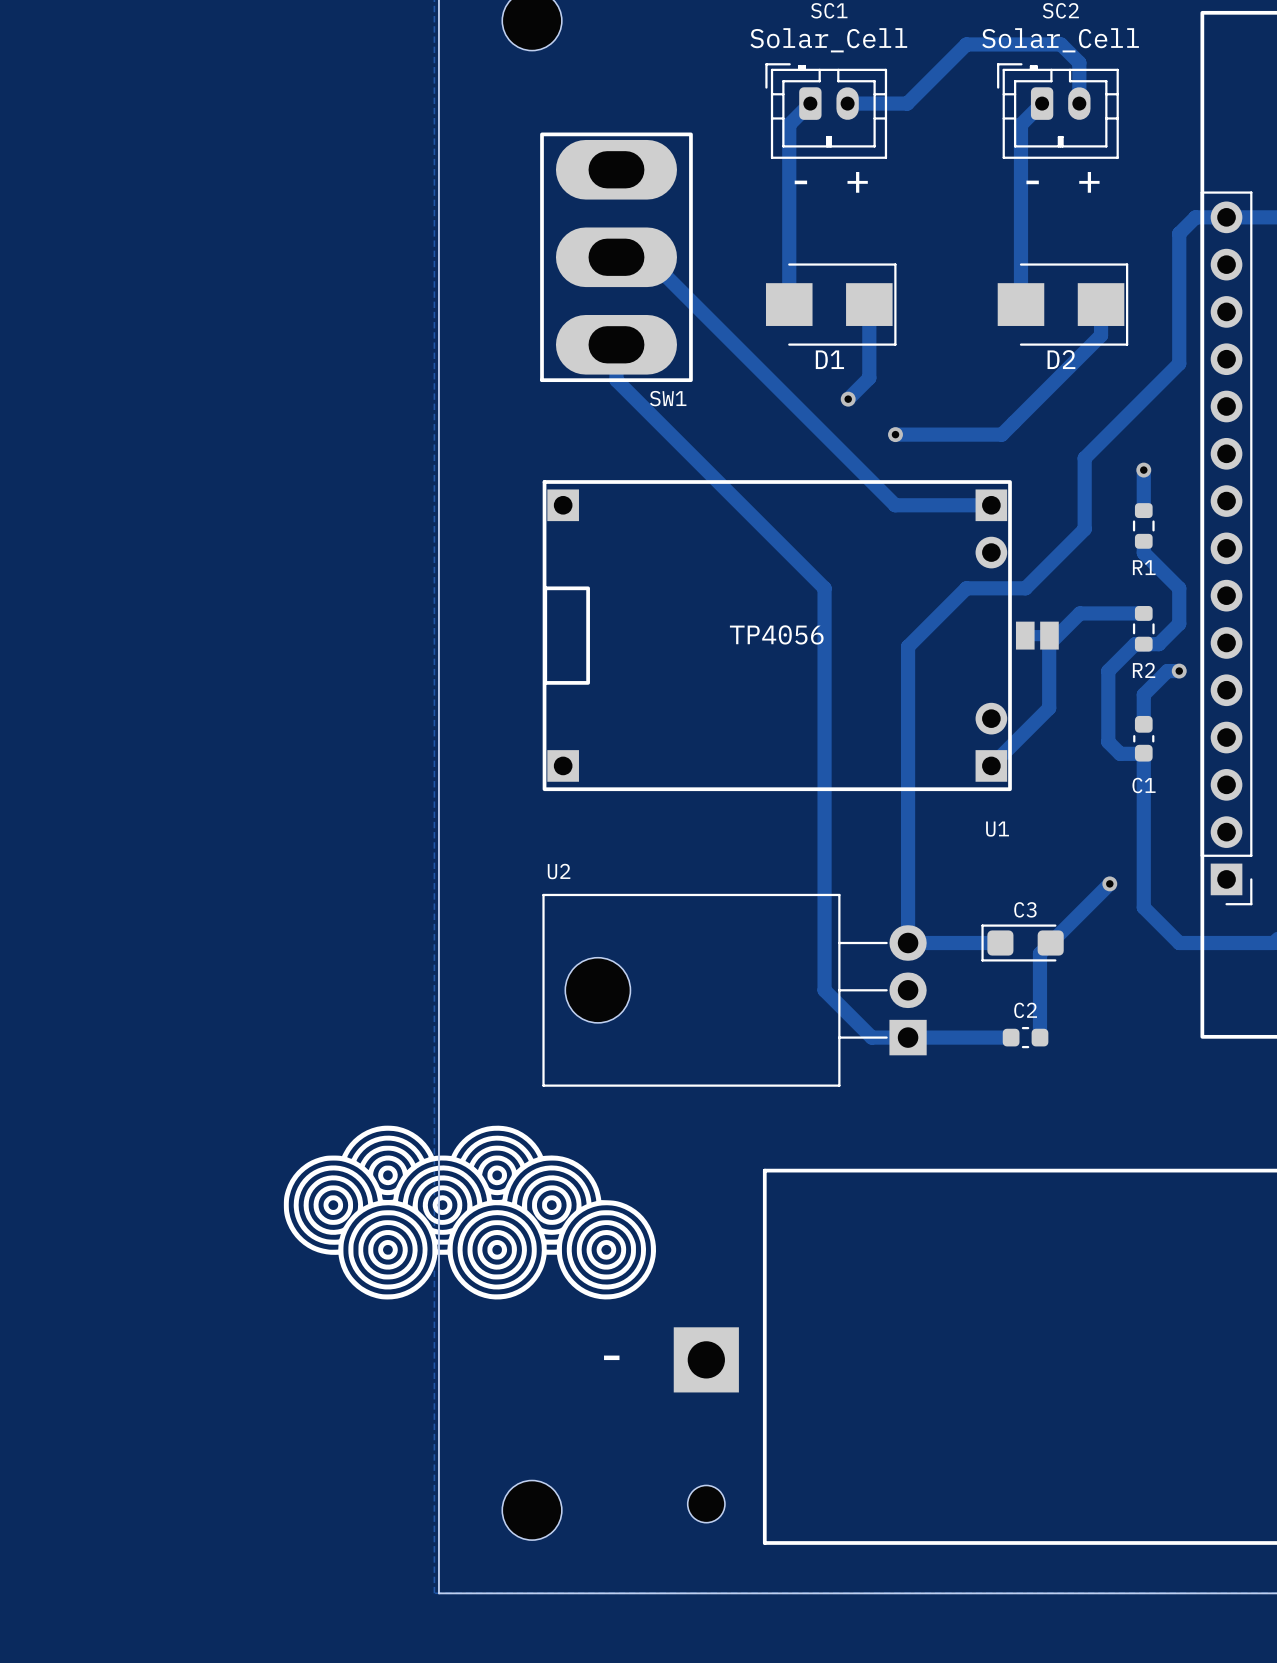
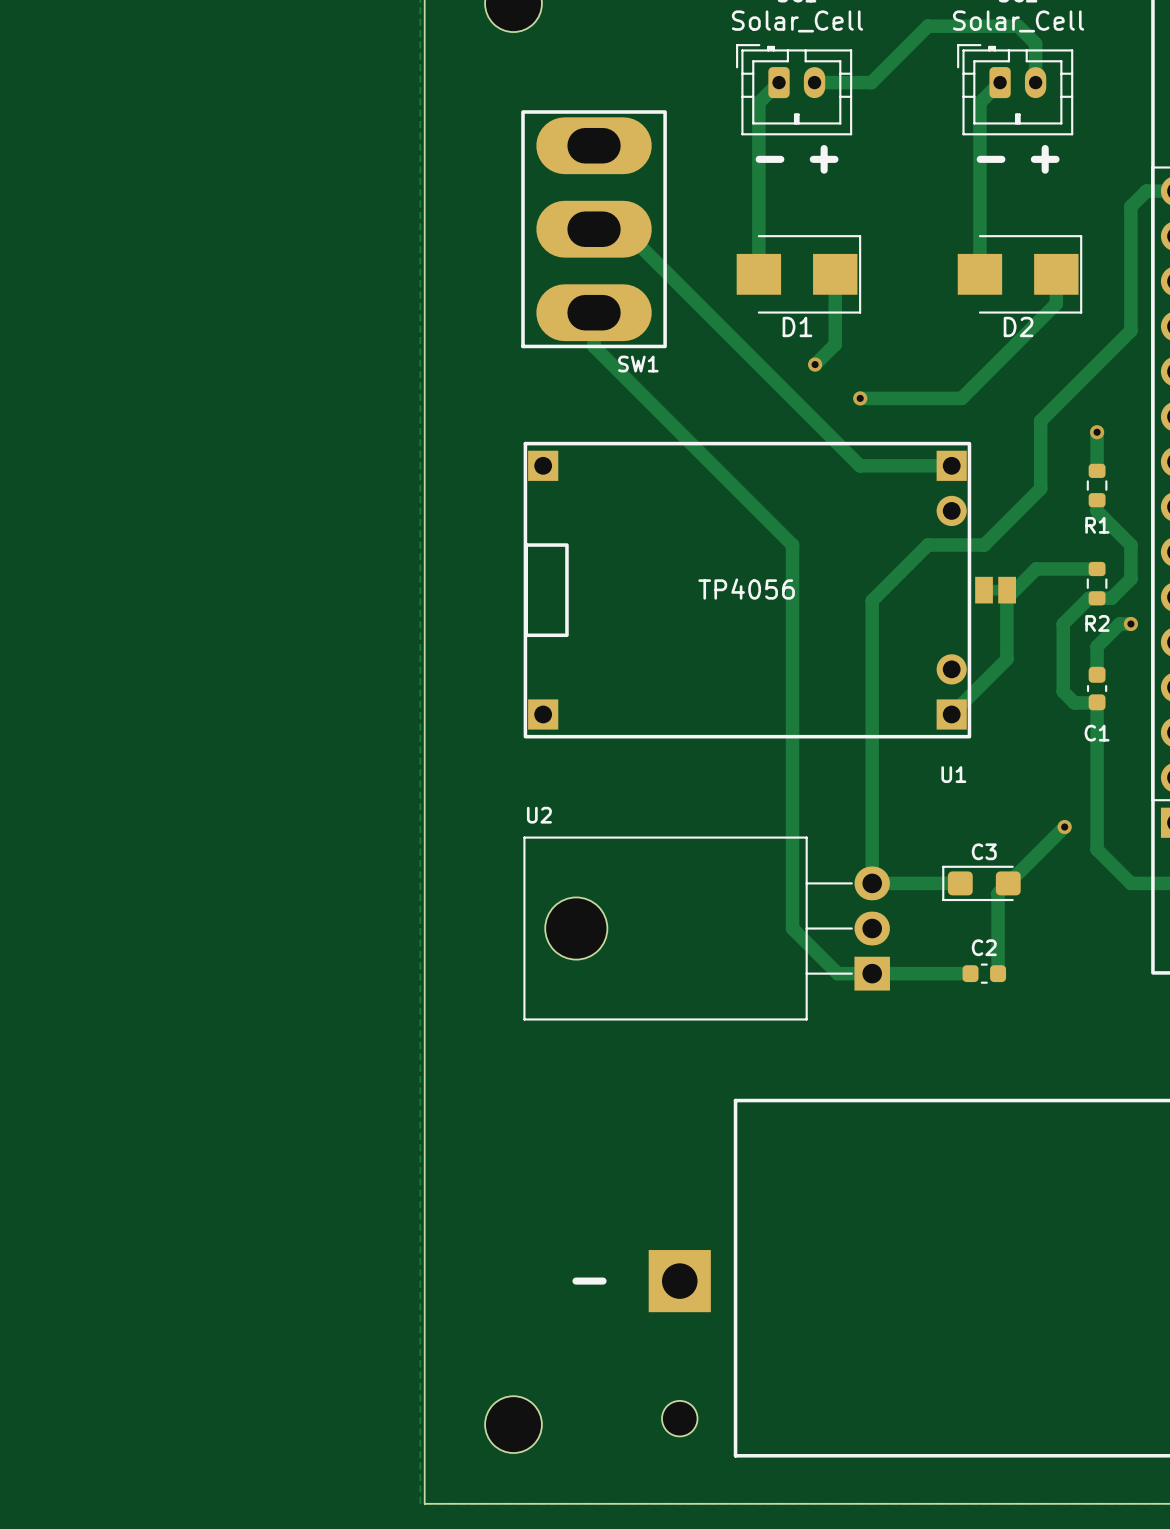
drawing: [283, 1125, 657, 1300] -> none

